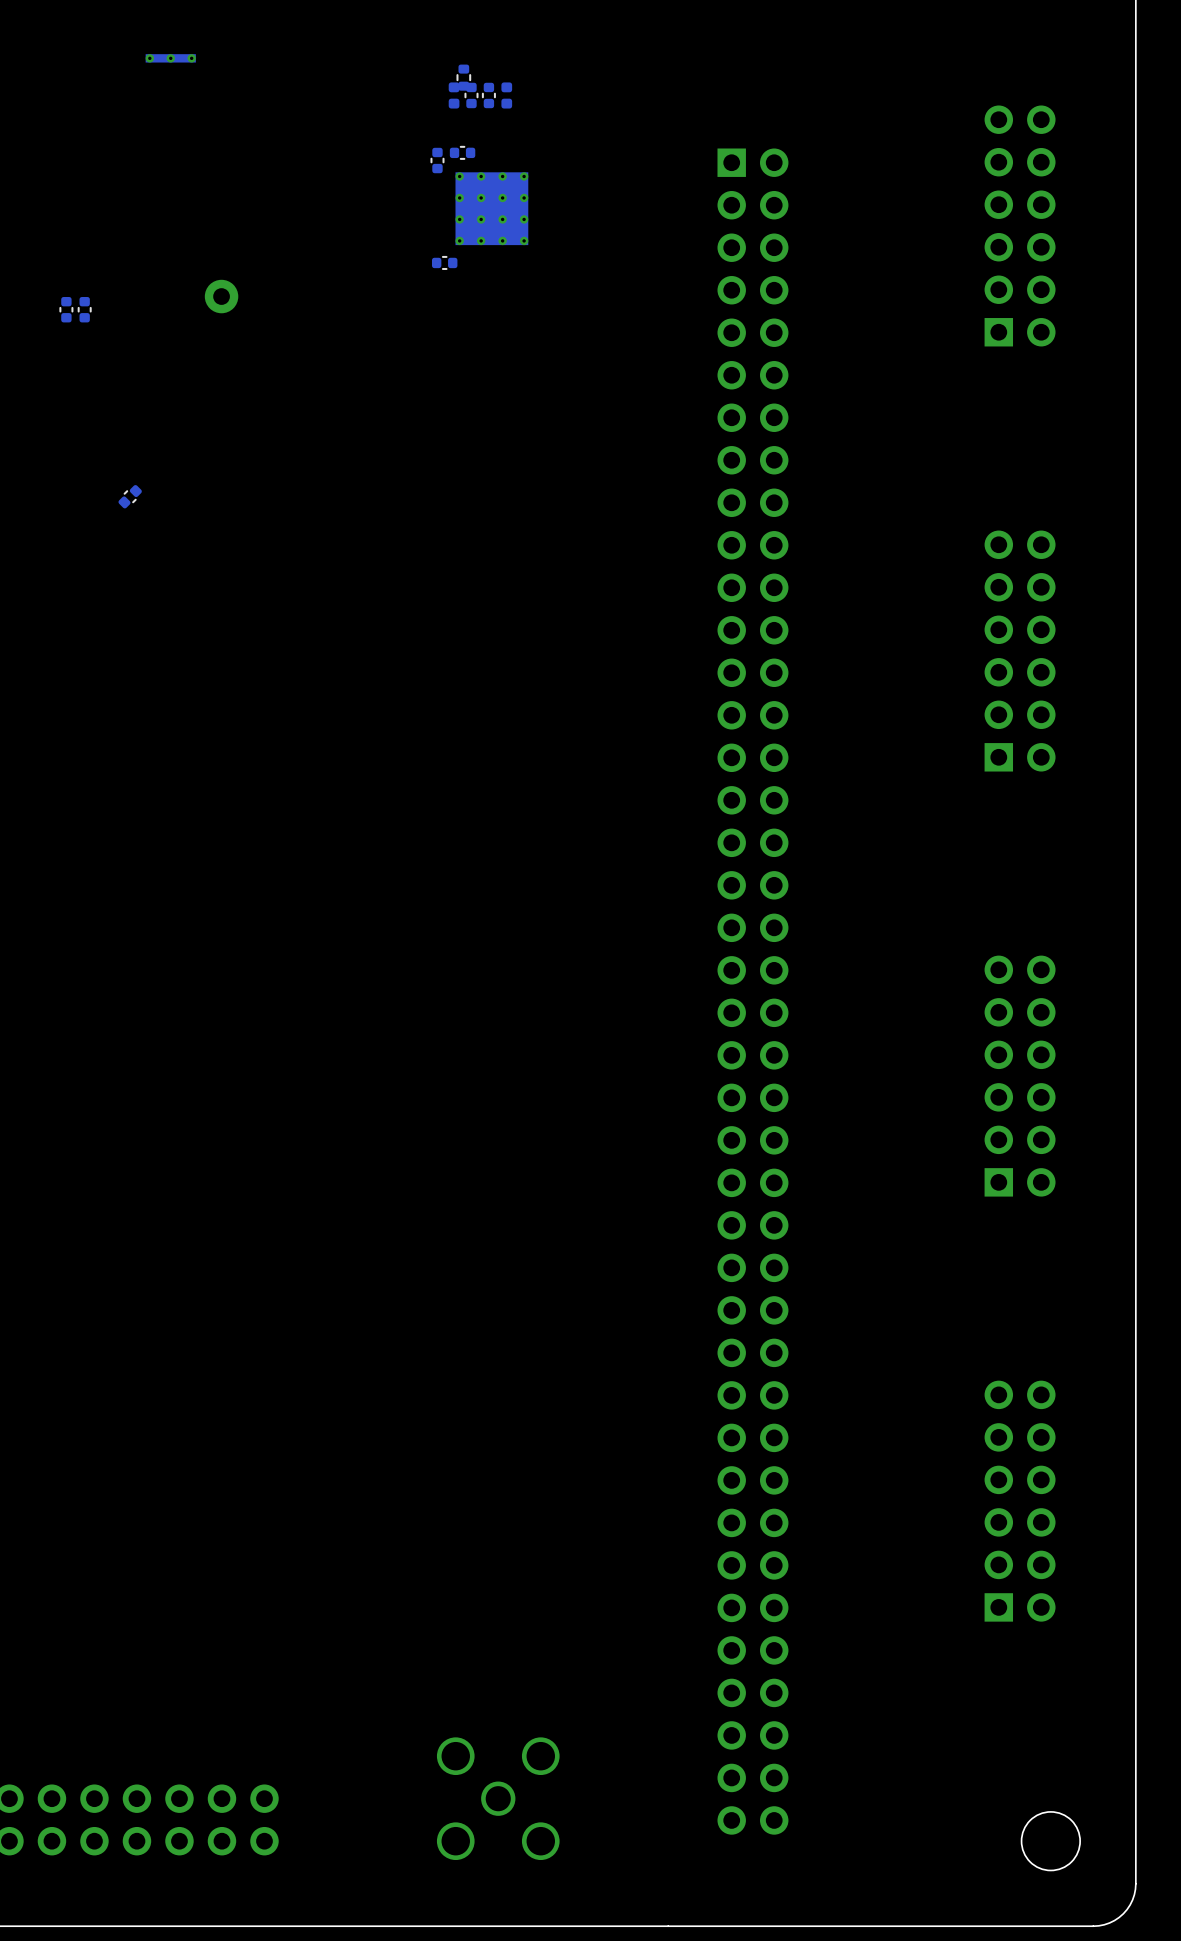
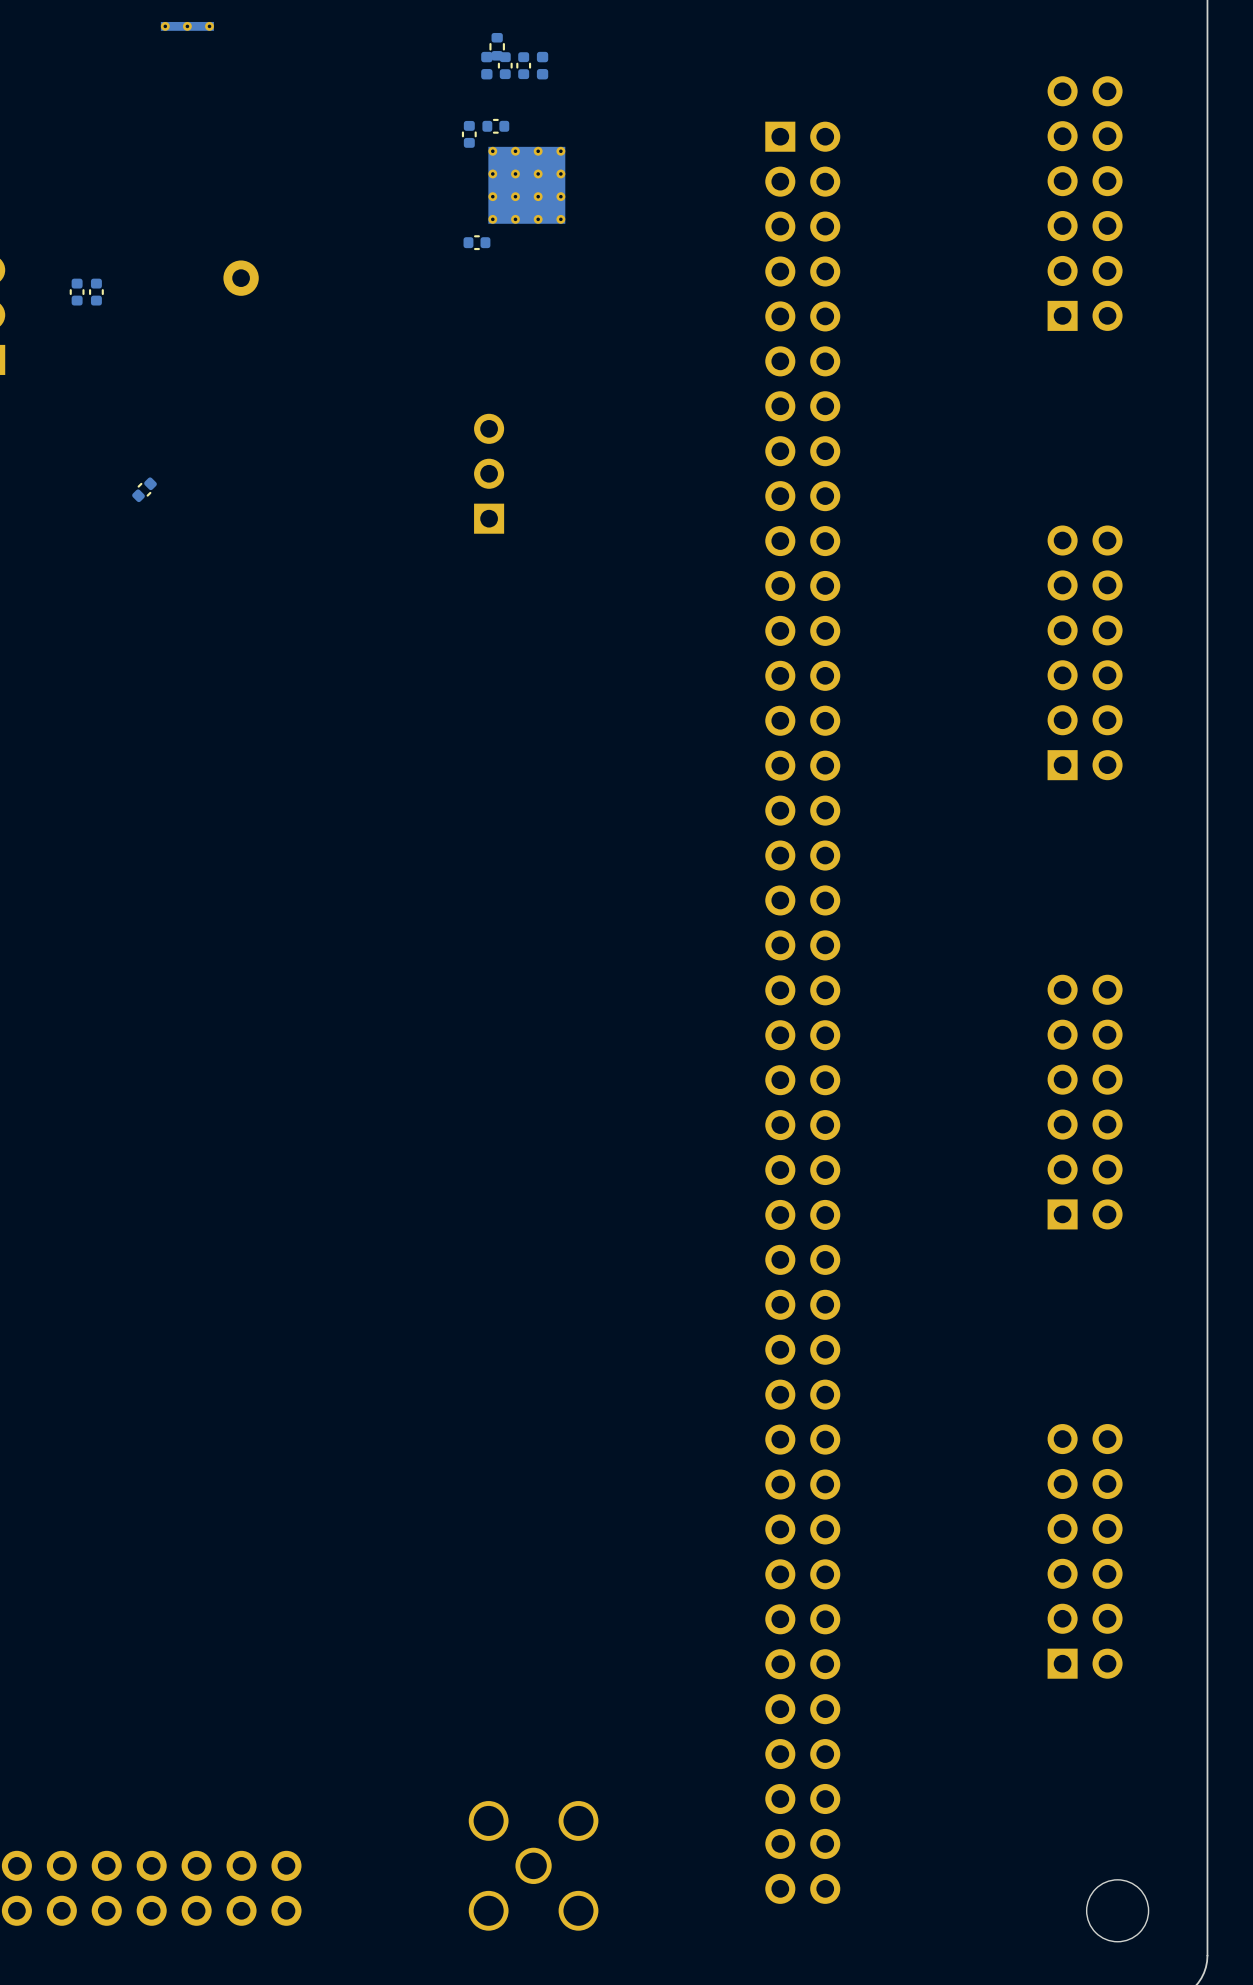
part: none -> (489, 473)

